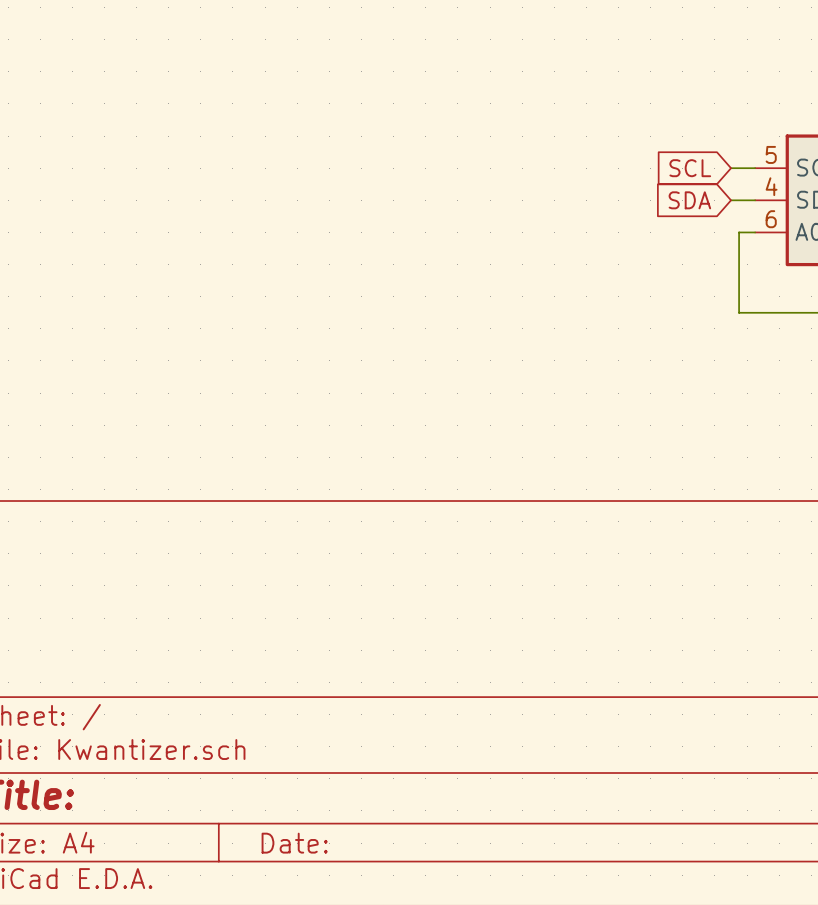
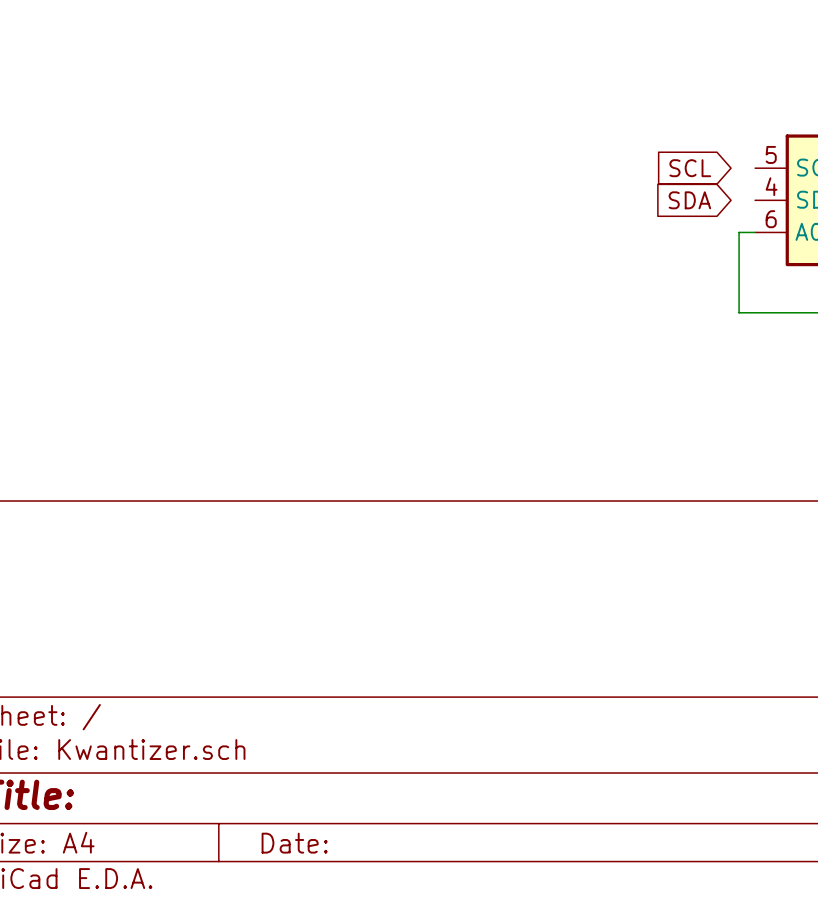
wire: (731, 168) (755, 168) -> none
wire: (731, 200) (755, 200) -> none

